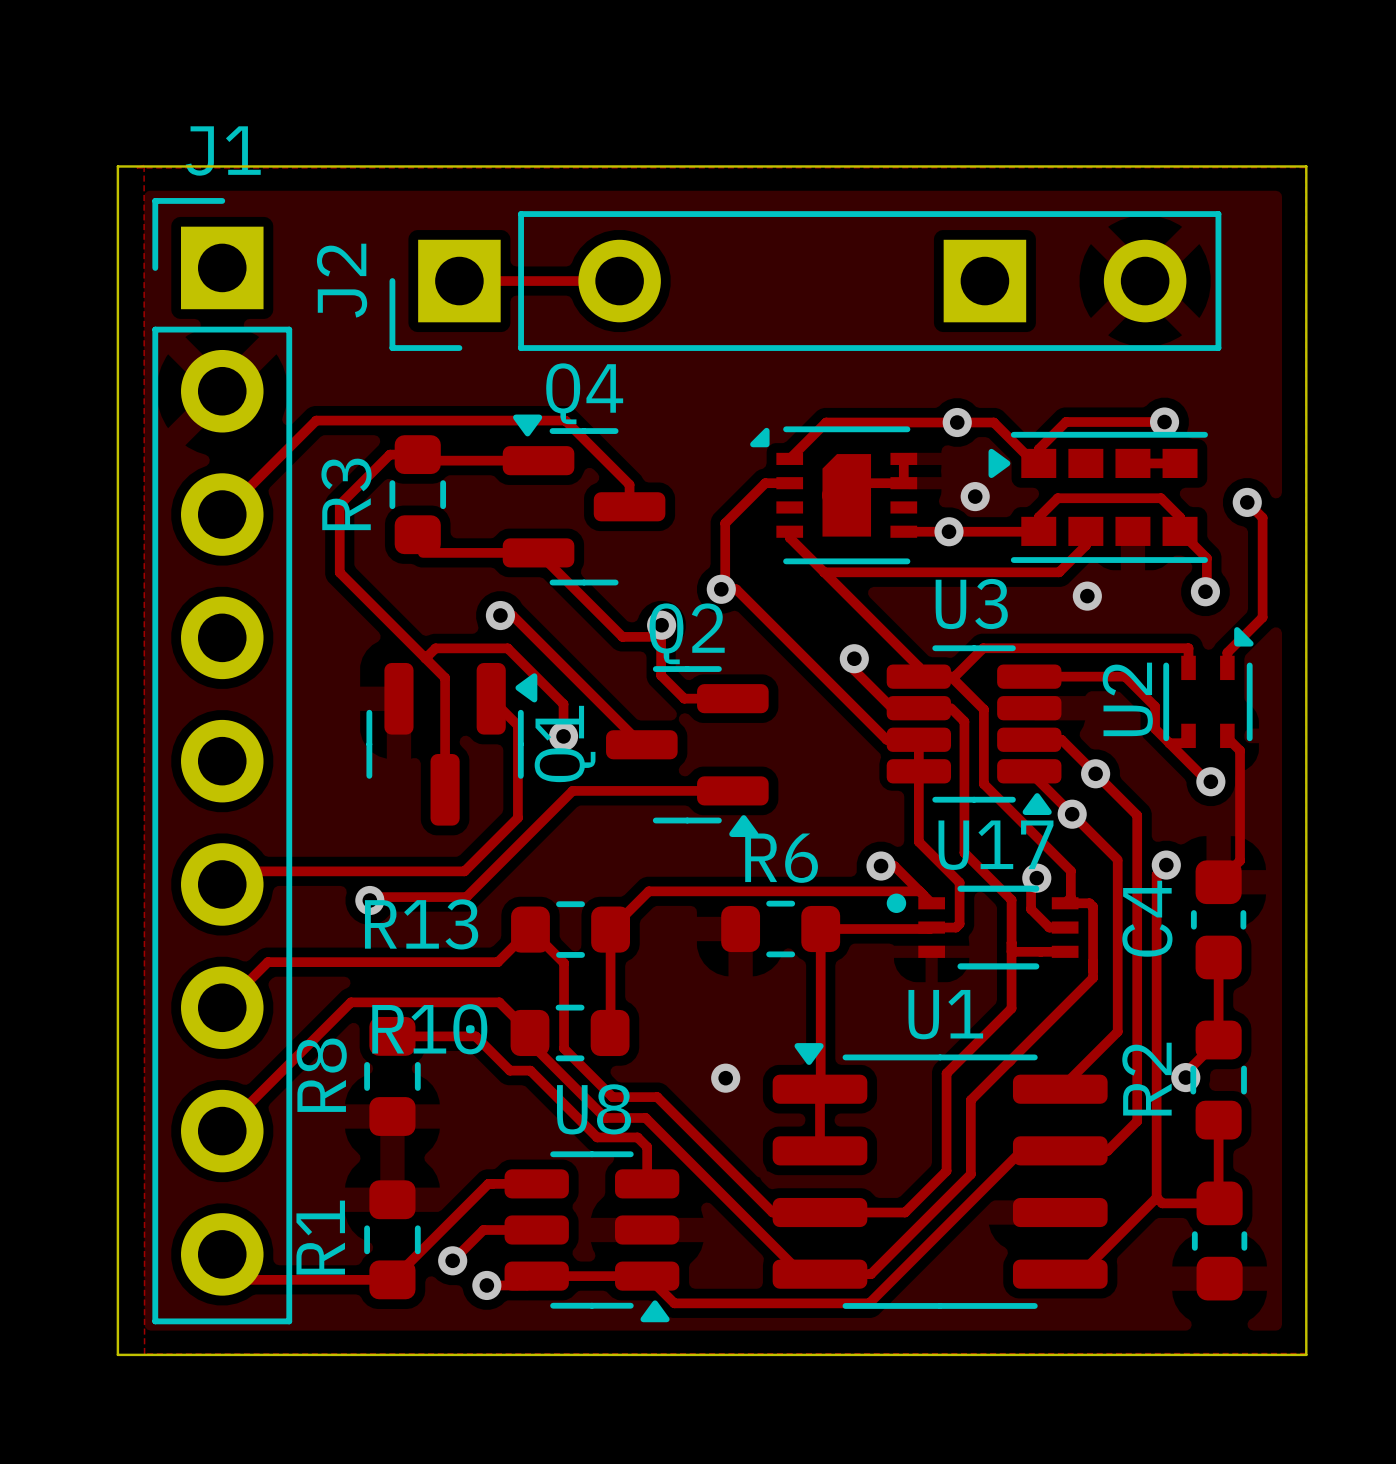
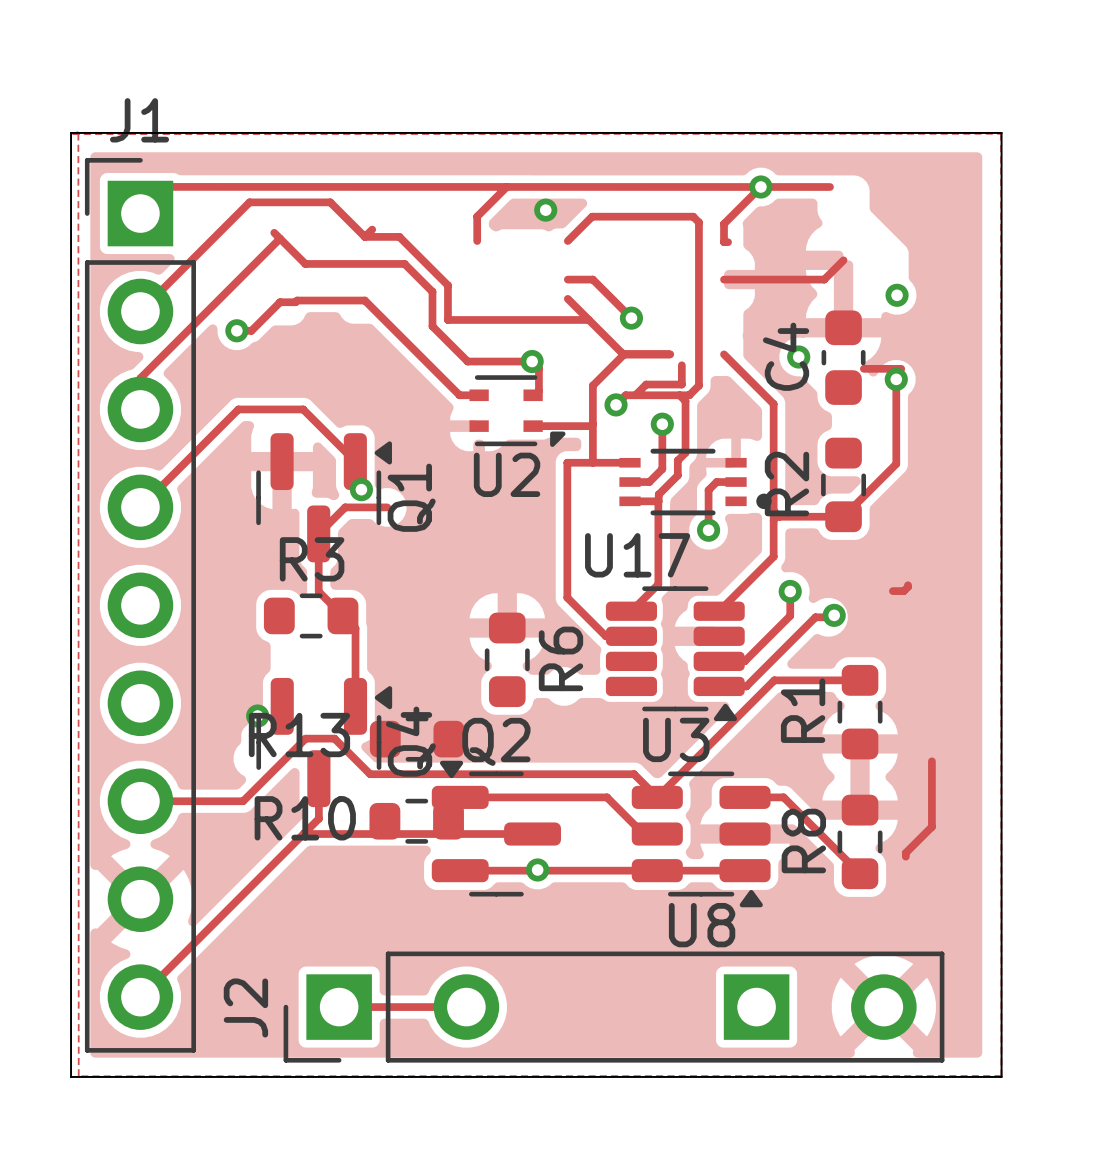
board edge: (134, 166) (117, 166) (117, 1354) (134, 1354) -> (71, 132) (71, 1076)
track: none -> (167, 186) (830, 186)
track: none -> (506, 186) (477, 216) (477, 241)
track: none -> (760, 186) (724, 223) (724, 242) (728, 242)
via: none -> (760, 186)
via: none -> (545, 210)
track: (459, 281) (619, 281) -> (339, 1007) (466, 1007)
J2 position: (805, 281) -> (614, 1007)
track: none -> (372, 229) (364, 236)
track: none -> (274, 232) (305, 263) (404, 263) (432, 291) (432, 326) (467, 361) (532, 361) (538, 368) (538, 391) (533, 395)
track: none -> (364, 236) (330, 202) (249, 202) (140, 311)
track: none -> (364, 236) (399, 236) (447, 285) (447, 319) (588, 319)
track: none -> (567, 241) (592, 216) (693, 216) (698, 222) (698, 385) (689, 395) (625, 395) (616, 404)
track: none -> (843, 260) (824, 279) (724, 279)
track: none -> (567, 279) (592, 279) (631, 318)
via: none -> (897, 295)
track: none -> (567, 298) (621, 354) (670, 354)
via: none -> (631, 318)
track: none -> (236, 330) (251, 330) (280, 302) (364, 300) (459, 395) (479, 395)
via: none -> (236, 330)
via: (957, 422) -> none
track: (1164, 422) (1066, 422) (1038, 449) (1038, 463) -> none
via: (1164, 422) -> none
track: none -> (624, 354) (592, 385) (592, 462)
track: none -> (724, 354) (773, 404) (773, 556) (719, 611)
via: none -> (798, 357)
track: (417, 454) (389, 454) (339, 504) (339, 572) (445, 677) (445, 789) -> none
via: none -> (532, 361)
track: (411, 458) (413, 460) (538, 460) -> none
track: (789, 458) (826, 422) (993, 422) (1034, 463) (1040, 463) -> none
track: none -> (896, 379) (896, 464) (843, 516) (779, 516) (773, 510)
via: none -> (896, 379)
track: (789, 483) (765, 483) (725, 523) (725, 585) (721, 589) (736, 589) (886, 739) (918, 739) (918, 841) (959, 882) (959, 923) (956, 927) (820, 929) (819, 1150) -> none
R3 rotation: 0° (417, 494) -> 90° clockwise (311, 615)
R3 position: (417, 494) -> (311, 615)
part: (833, 495) -> none
track: none -> (679, 395) (685, 401) (685, 452) (677, 460) (677, 475) (658, 494) (658, 501)
via: (975, 496) -> none
part: (1098, 497) -> none
Q4 rotation: 0° (584, 499) -> 90° clockwise (324, 742)
Q4 position: (584, 499) -> (324, 742)
track: (1247, 502) (1262, 517) (1262, 617) (1227, 652) (1227, 667) -> none
via: (1247, 502) -> none
track: (629, 506) (629, 484) (565, 420) (316, 420) (222, 514) -> (280, 238) (140, 378) (140, 409)
via: none -> (616, 404)
track: (903, 531) (1038, 531) -> none
via: (949, 531) -> none
track: (1038, 531) (1038, 517) (1057, 498) (1161, 498) (1180, 517) (1180, 531) (1206, 558) (1205, 591) -> none
track: (1085, 531) (1085, 545) (1059, 572) (824, 572) -> none
track: (788, 533) (789, 531) (789, 537) (918, 666) (918, 676) (954, 676) (983, 648) (1188, 648) (1188, 667) -> none
track: none -> (592, 424) (590, 426) (533, 426)
track: none -> (662, 424) (662, 469) (649, 482) (630, 482)
via: none -> (662, 424)
track: (422, 552) (538, 552) (622, 636) (649, 636) -> none
track: none -> (355, 461) (303, 409) (238, 409) (140, 507)
track: none -> (630, 462) (567, 462) (567, 597) (605, 636) (631, 636)
via: (721, 589) -> none
via: (1205, 591) -> none
via: (1087, 596) -> none
U3 name position: U3 (971, 604) -> U3 (676, 739)
track: none -> (736, 482) (716, 482) (708, 490) (708, 530)
track: (500, 615) (512, 615) (641, 744) -> none
track: (661, 625) (661, 675) (684, 698) (732, 698) -> none
via: (661, 625) -> none
track: none -> (630, 501) (658, 501) (658, 584) (631, 611)
track: none -> (387, 507) (345, 507) (318, 533) (318, 591) (355, 628) (355, 706)
track: (425, 658) (435, 648) (507, 648) (563, 704) (563, 736) -> none
track: (854, 658) (854, 670) (892, 708) (918, 708) -> none
via: (854, 658) -> none
via: none -> (708, 530)
track: (951, 676) (983, 709) (983, 784) (1070, 871) (1070, 897) (1065, 903) (1089, 903) (1093, 906) (1093, 977) (970, 1100) (970, 1174) (870, 1274) (801, 1274) (645, 1117) (605, 1117) (530, 1042) (530, 1032) (499, 1002) (350, 1002) (222, 1131) -> none
track: (1029, 676) (1125, 676) (1155, 706) (1155, 728) (1207, 781) (1210, 781) -> none
U2 rotation: 0° (1208, 687) -> 90° clockwise (517, 411)
U2 position: (1208, 687) -> (517, 411)
track: (491, 698) (517, 725) (517, 817) (464, 871) (235, 871) (222, 884) -> none
track: (951, 708) (964, 721) (964, 852) (1011, 899) (1011, 1008) (946, 1073) (946, 1171) (905, 1212) (772, 1212) (657, 1097) (612, 1097) (564, 1048) (564, 963) (530, 929) (497, 962) (267, 962) (222, 1007) -> (860, 680) (774, 680) (657, 797) (634, 774) (370, 774) (334, 738) (305, 738) (243, 801) (140, 801)
U3 position: (974, 730) -> (675, 653)
track: (1227, 735) (1240, 750) (1240, 860) (1218, 882) -> none
via: (563, 736) -> none
track: (1029, 739) (1061, 739) (1137, 815) (1137, 1121) (1107, 1150) (1021, 1150) (869, 1303) (674, 1303) (647, 1276) (536, 1276) (527, 1285) (486, 1285) -> none
track: none -> (790, 591) (790, 615) (744, 661) (719, 661)
via: none -> (790, 591)
Q1 position: (451, 744) -> (324, 497)
Q2 rotation: 0° (687, 751) -> 180° (496, 828)
Q2 position: (687, 751) -> (496, 828)
track: (1029, 771) (1117, 859) -> none
track: none -> (828, 617) (815, 617) (746, 686) (719, 686)
via: (1210, 781) -> none
track: (732, 790) (572, 790) (466, 897) (373, 897) (369, 900) -> none
via: (1072, 814) -> none
track: (1117, 861) (1117, 1031) (1060, 1089) -> none
track: (1166, 865) (1156, 874) (1156, 1197) -> none
via: (1166, 865) -> none
track: (881, 866) (894, 866) (931, 903) -> none
via: (881, 866) -> none
track: (1036, 878) (1031, 883) (1031, 909) (1049, 927) (1065, 927) -> none
via: (1036, 878) -> none
track: (919, 891) (648, 891) (610, 929) (610, 1032) -> none
C4 position: (1218, 919) -> (843, 357)
U17 rotation: 0° (982, 927) -> 180° (695, 482)
U17 position: (982, 927) -> (695, 482)
R6 rotation: 0° (780, 929) -> 90° clockwise (507, 659)
R6 position: (780, 929) -> (507, 659)
track: (1011, 951) (1065, 951) -> none
track: none -> (460, 797) (606, 797) (643, 834)
track: none -> (745, 797) (783, 797) (860, 873)
track: (392, 1036) (475, 1036) (509, 1070) (530, 1070) (597, 1137) (637, 1137) (647, 1147) (647, 1183) -> none
track: none -> (304, 833) (532, 834)
R8 position: (392, 1076) -> (860, 841)
via: (1185, 1077) -> none
via position: (725, 1078) -> (537, 869)
R2 position: (1218, 1080) -> (843, 484)
track: none -> (460, 870) (745, 870)
U8 name position: U8 (594, 1109) -> U8 (702, 925)
track: (1218, 1120) (1219, 1203) (1162, 1203) (1156, 1197) -> none
U1: (940, 1175) -> none
track: (536, 1183) (488, 1183) (392, 1279) (247, 1279) (222, 1254) -> (318, 778) (318, 818) (140, 997)
track: (1156, 1197) (1080, 1274) (1060, 1274) -> none
track: (536, 1230) (483, 1230) (452, 1260) -> none
U8 position: (591, 1236) -> (701, 839)
R1 position: (392, 1239) -> (860, 712)
part: (1219, 1240) -> none
via: (452, 1260) -> none
via: (486, 1285) -> none

